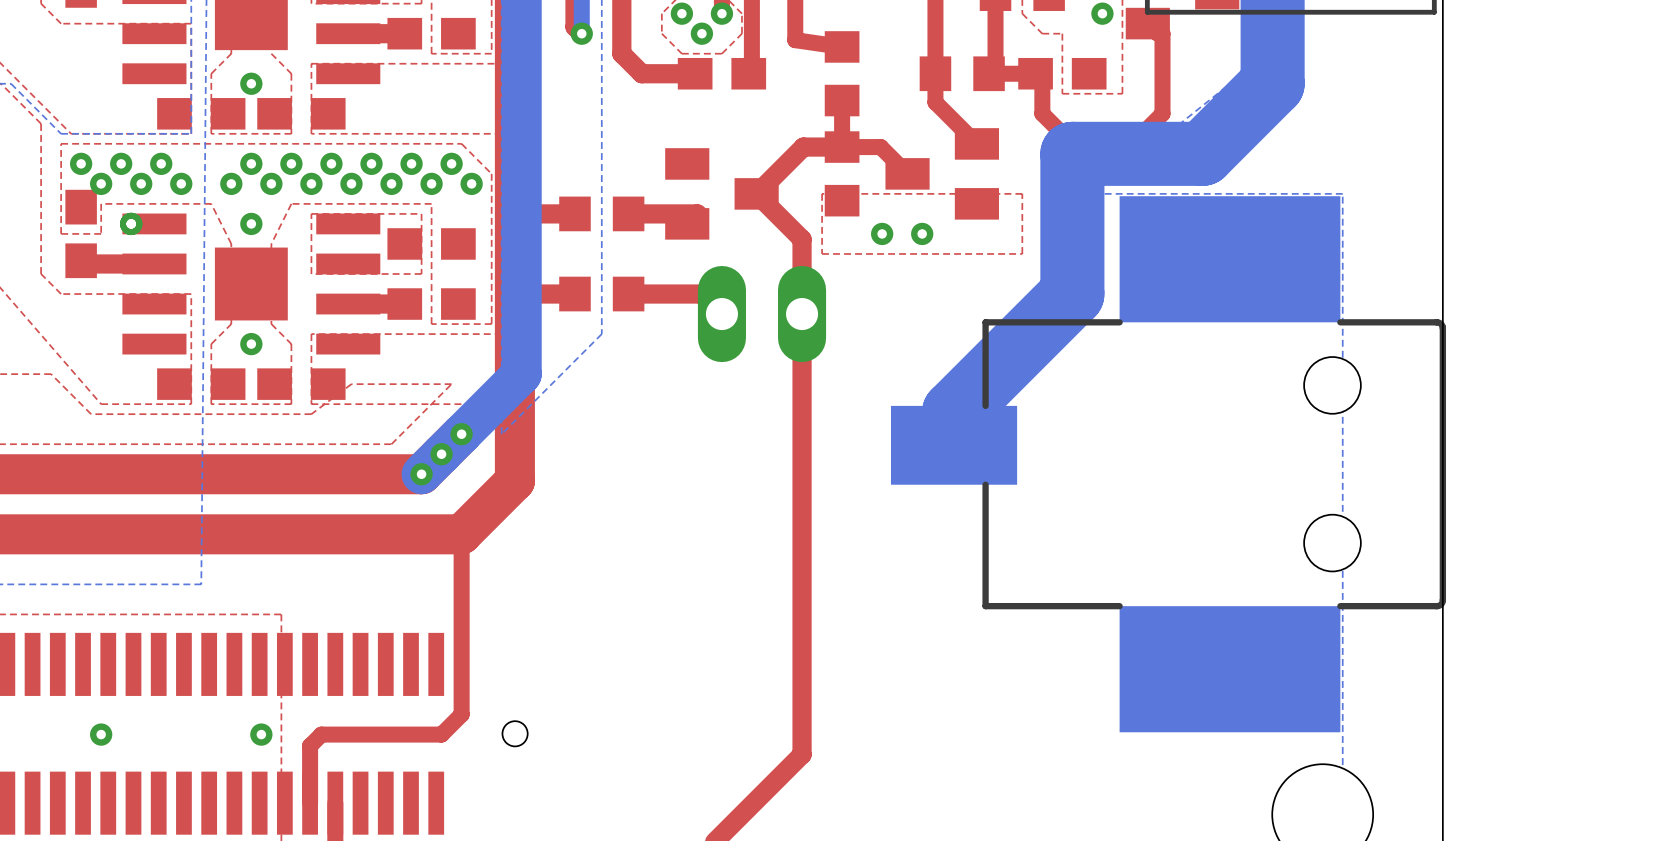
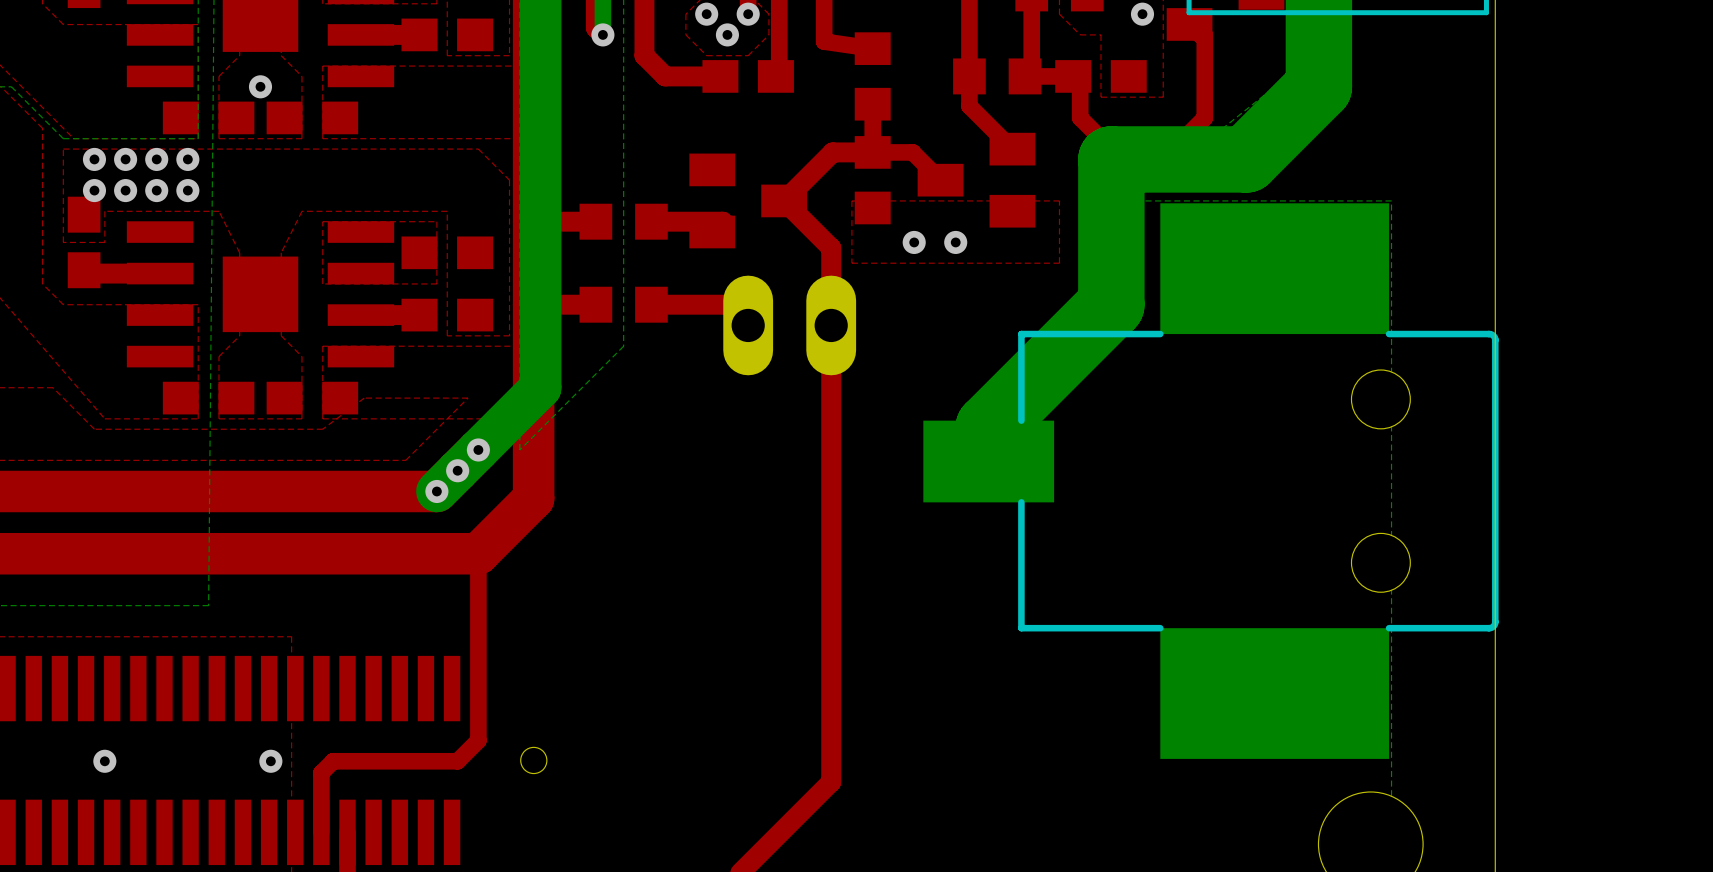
via: none -> (94, 159)
via: none -> (125, 159)
via: none -> (156, 159)
via: none -> (187, 159)
via: (81, 163) -> none
via: (121, 163) -> none
via: (161, 163) -> none
via: (251, 163) -> none
via: (291, 163) -> none
via: (331, 163) -> none
via: (371, 163) -> none
via: (411, 163) -> none
via: (451, 163) -> none
via: none -> (94, 190)
via: (101, 183) -> none
via: none -> (125, 190)
via: (141, 183) -> none
via: none -> (156, 190)
via: (231, 183) -> none
via: (271, 183) -> none
via: (311, 183) -> none
via: (351, 183) -> none
via: (391, 183) -> none
via: (431, 183) -> none
via: (471, 183) -> none
via: (131, 223) -> none
via: (251, 223) -> none
via: (251, 344) -> none

